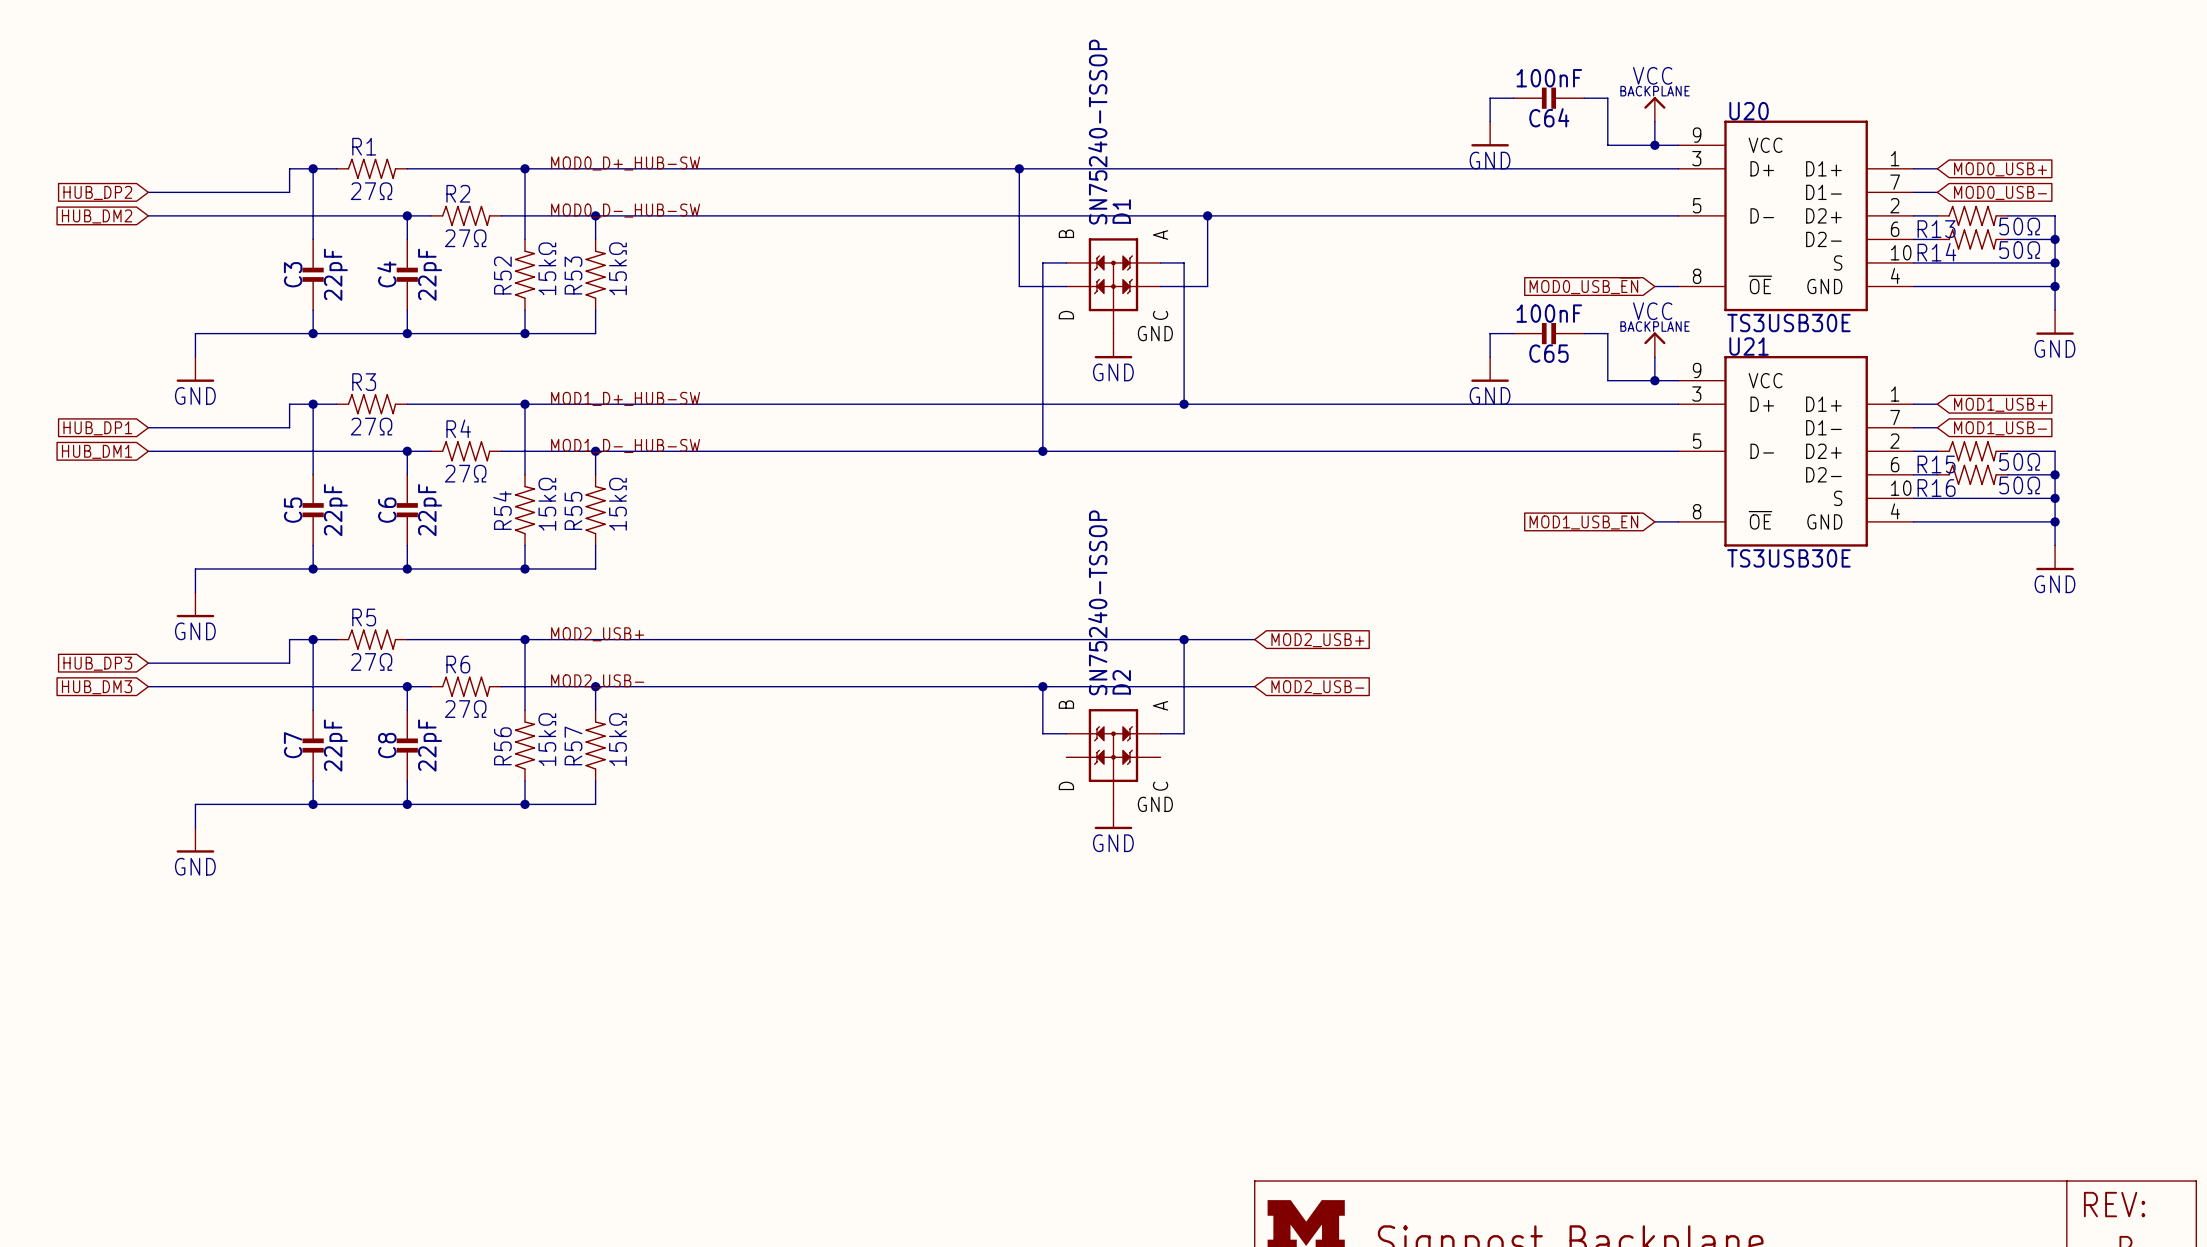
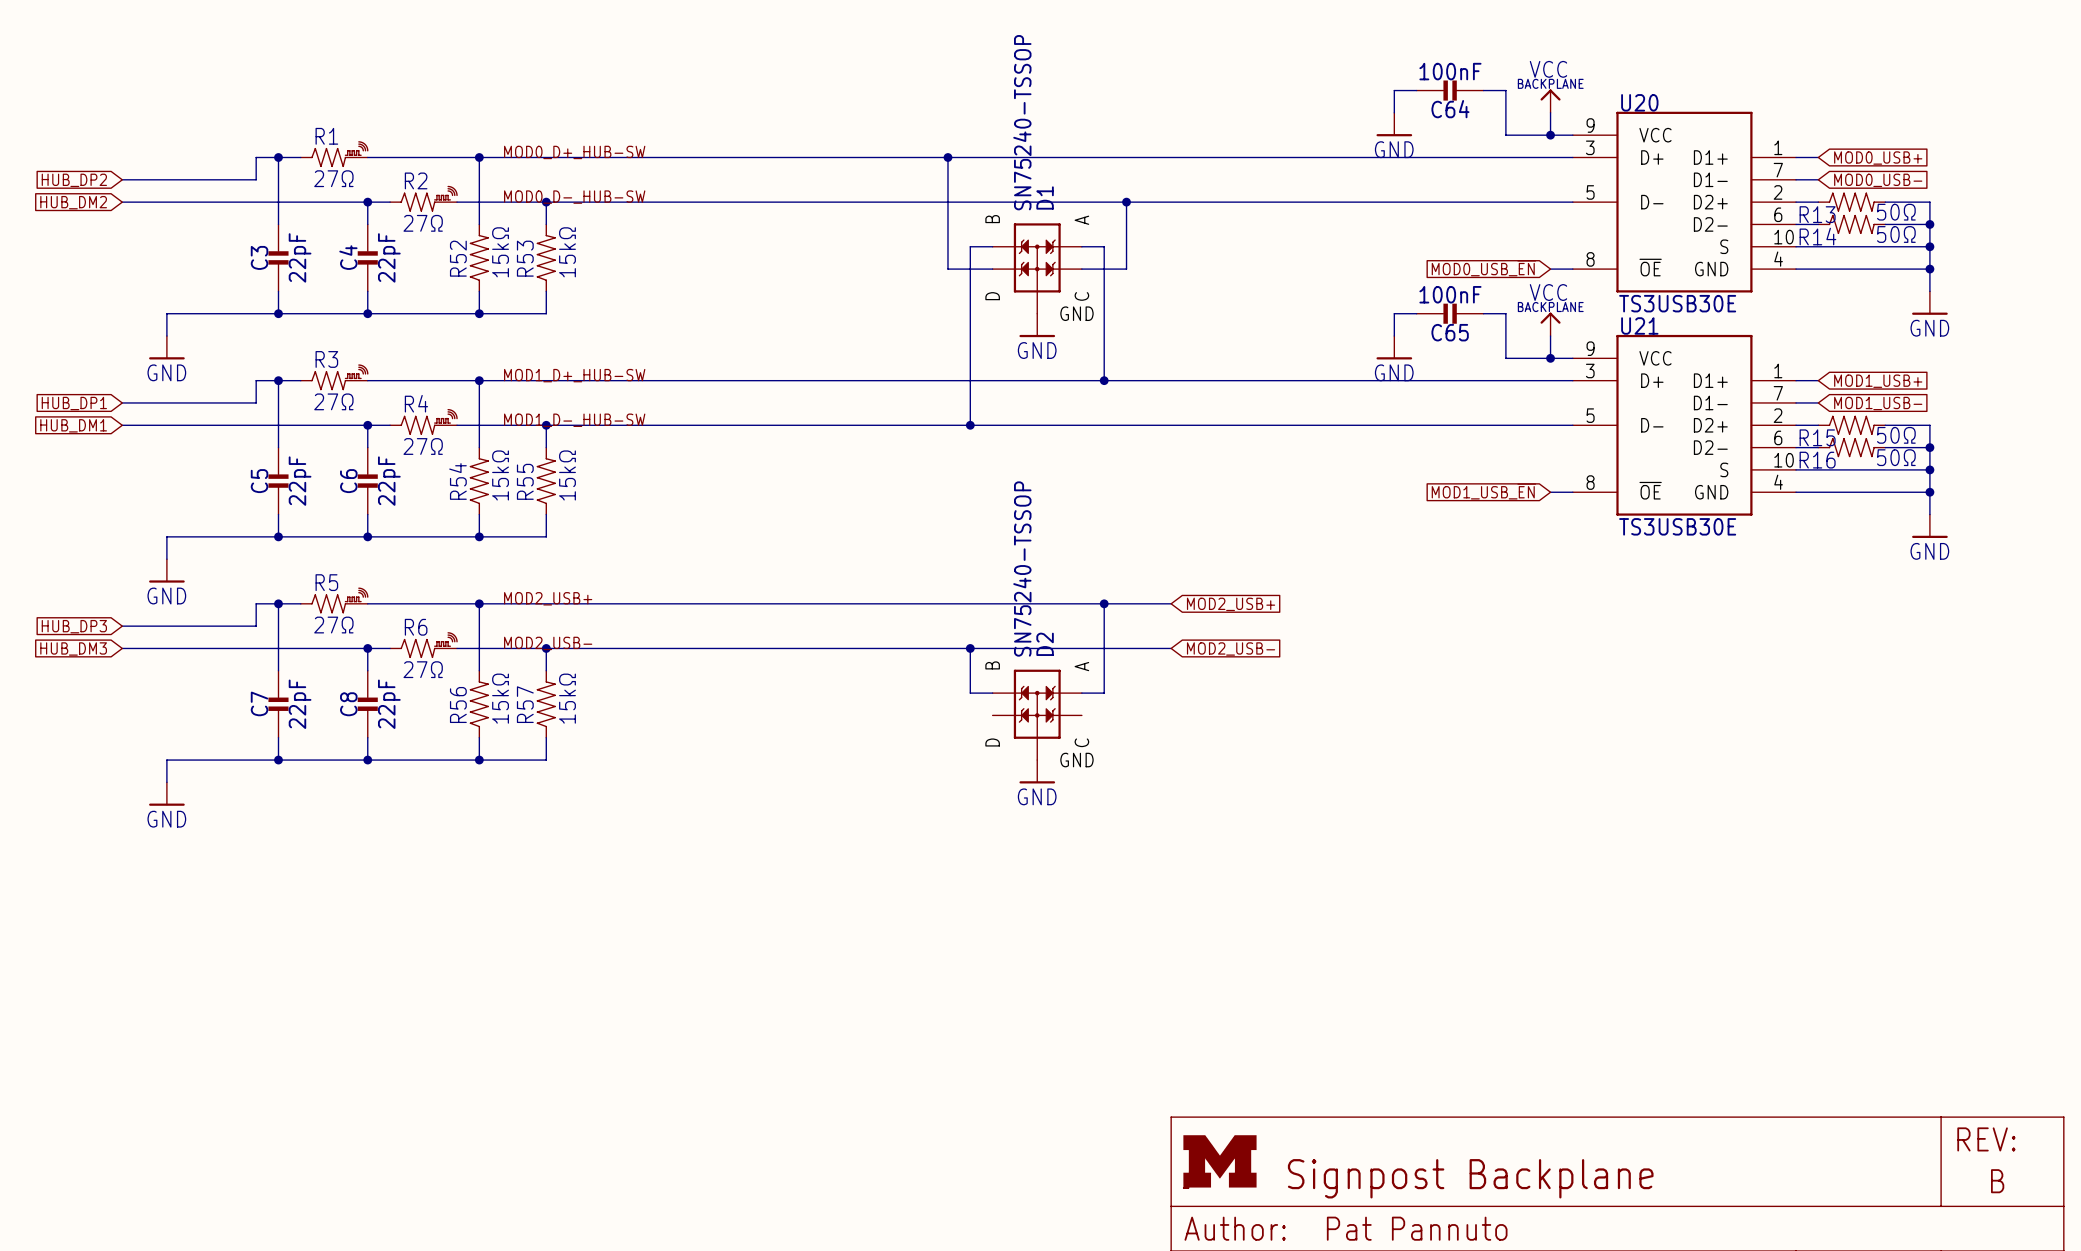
R1 symbol: [336, 158, 408, 179] -> [300, 141, 369, 167]
R2 symbol: [430, 205, 503, 227] -> [389, 186, 458, 212]
R3 symbol: [336, 394, 408, 415] -> [300, 364, 369, 391]
R4 symbol: [430, 441, 503, 462] -> [389, 409, 458, 435]
R5 symbol: [336, 629, 408, 650] -> [300, 587, 369, 614]
R6 symbol: [430, 676, 503, 697] -> [389, 632, 458, 658]

